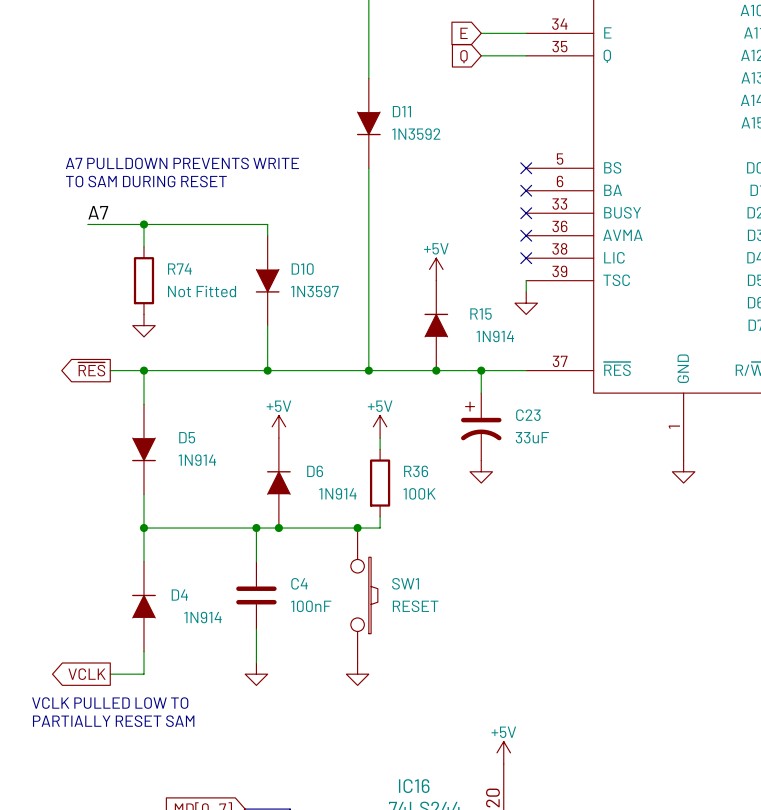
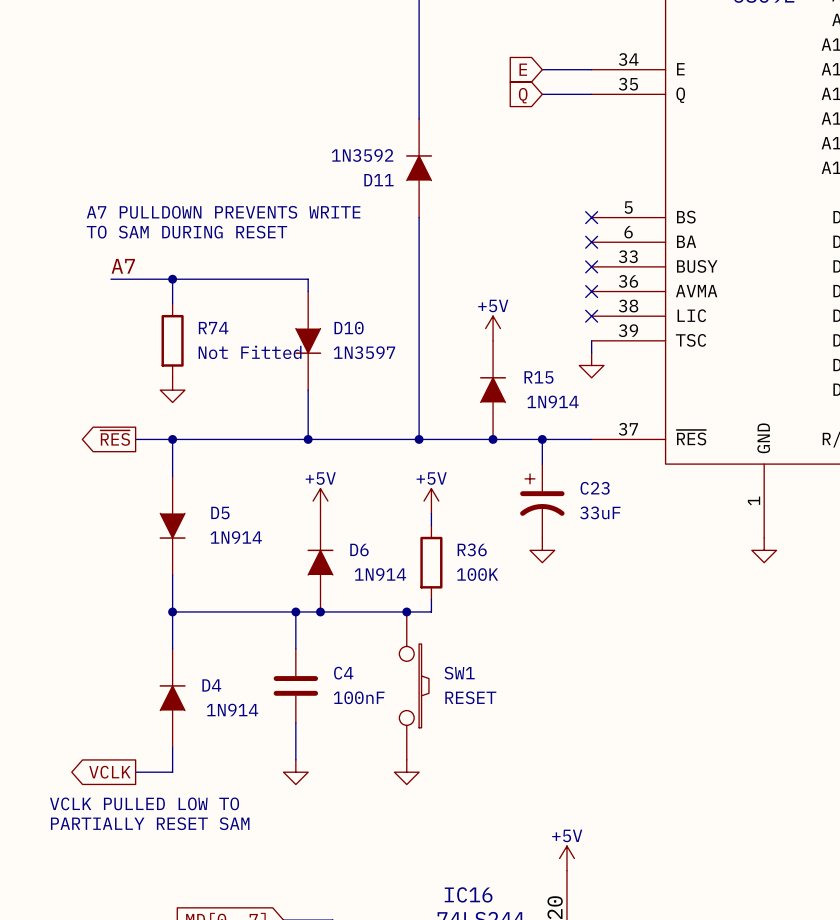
D11 rotation: 0° (368, 123) -> 180° (419, 167)

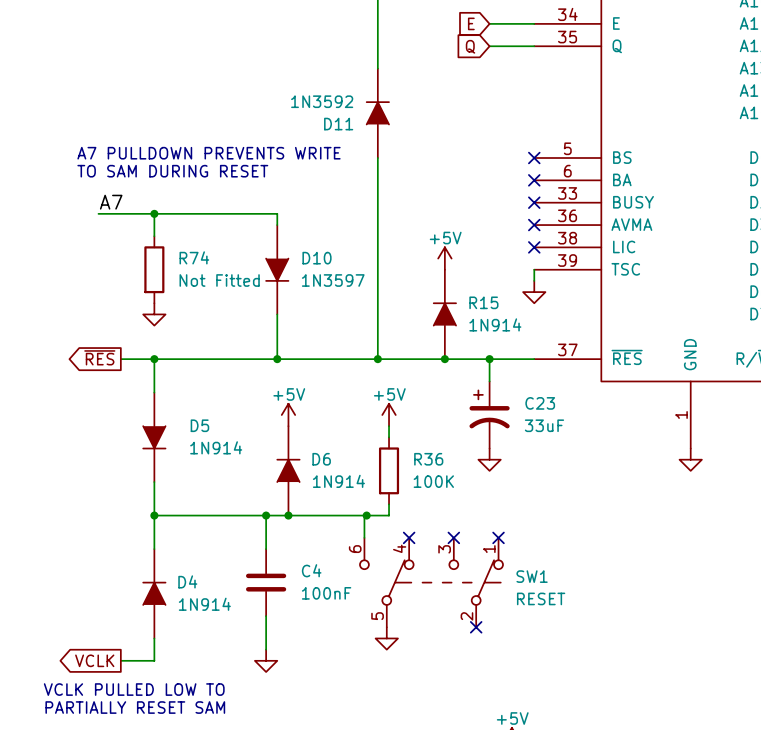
SW1 symbol: [399, 611, 429, 760] -> [359, 537, 503, 628]
wire: none -> (364, 515) (364, 537)
no-connect mark: none -> (409, 537)
no-connect mark: none -> (453, 537)
no-connect mark: none -> (498, 537)
SW1 name position: SW1 (459, 673) -> SW1 (532, 576)
SW1 value position: RESET (470, 697) -> RESET (541, 598)
no-connect mark: none -> (476, 627)
power symbol position: (406, 772) -> (386, 638)

